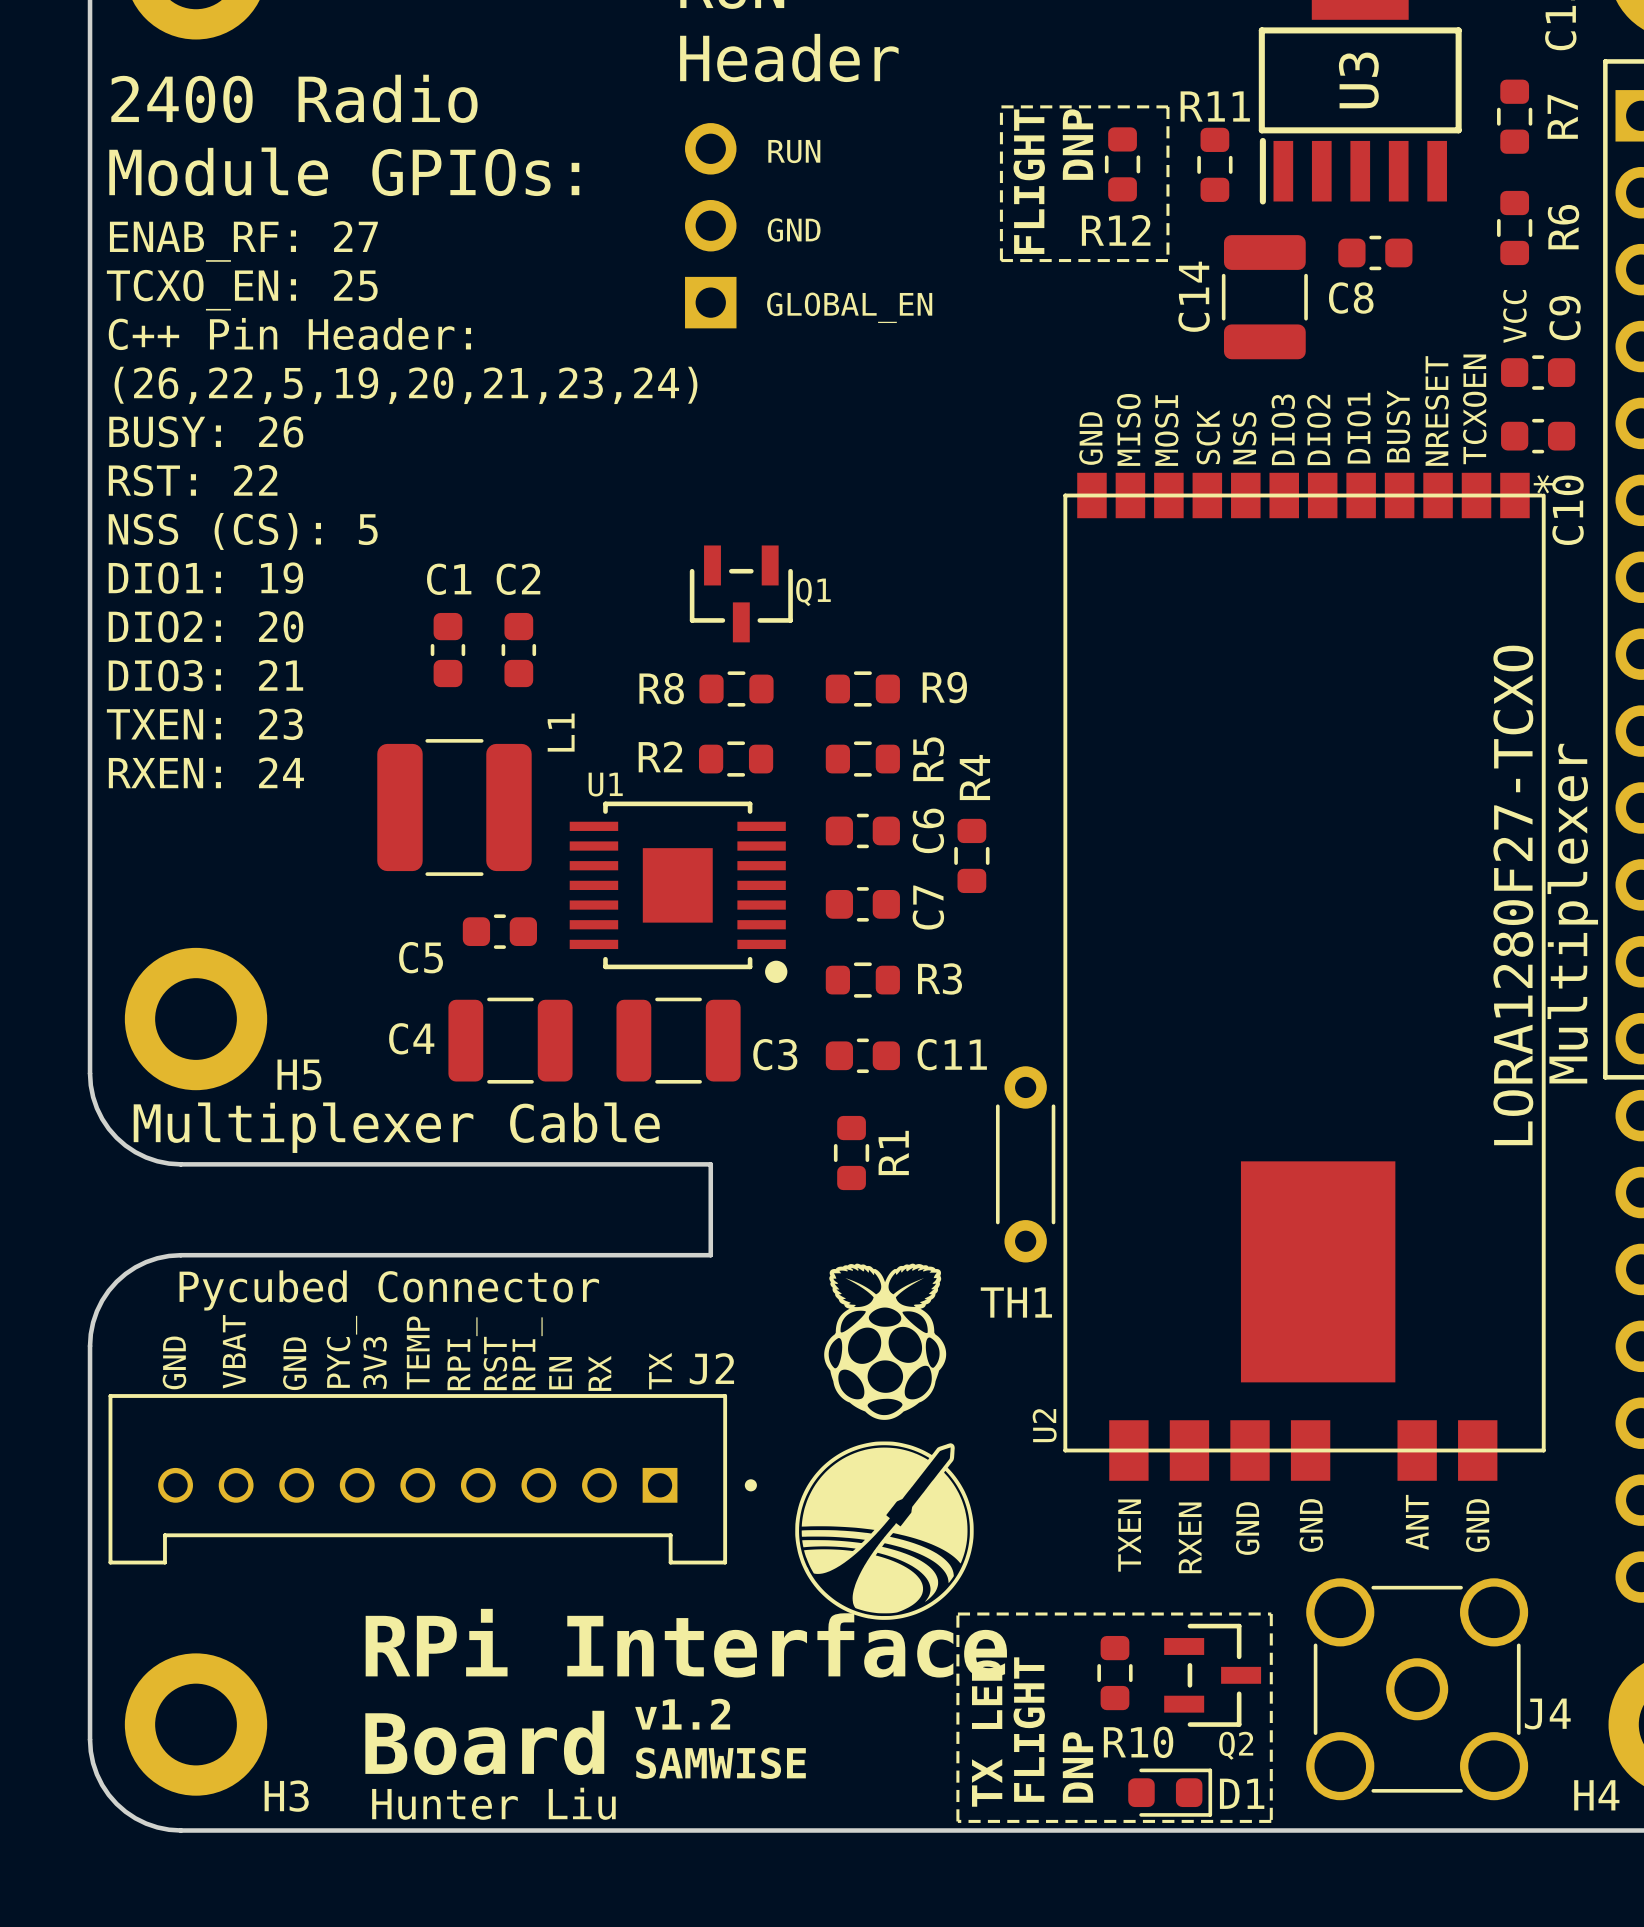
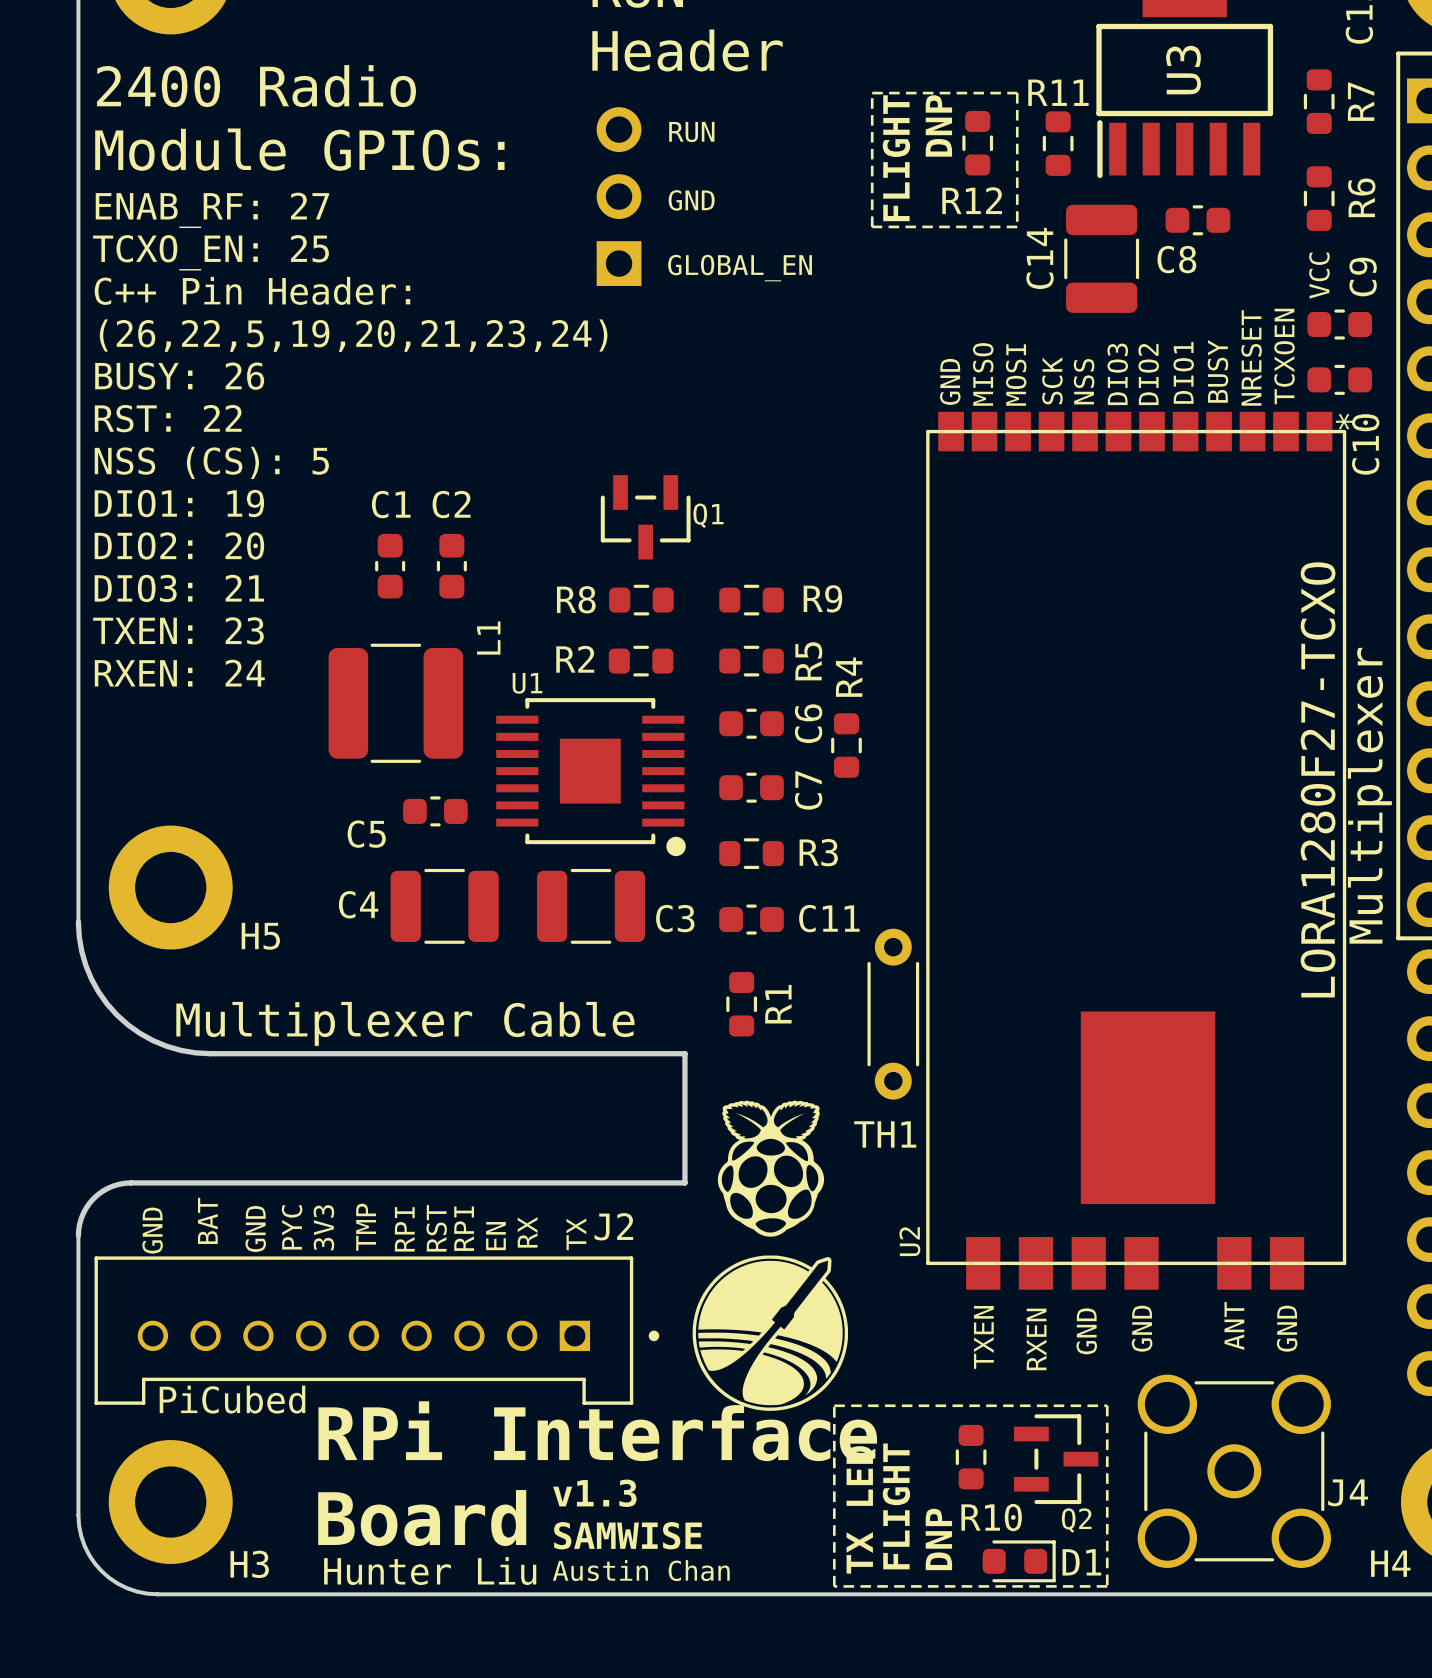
board edge: (90, 1058) (93, 1097) (96, 1108) (108, 1128) (116, 1137) (135, 1152) (146, 1157) (169, 1163) (710, 1164) (710, 1255) (180, 1255) (169, 1255) (146, 1262) (125, 1273) (116, 1281) (108, 1290) (96, 1311) (90, 1334) (90, 1346) (90, 1418) -> (78, 921) (81, 951) (85, 965) (91, 979) (107, 1004) (128, 1024) (140, 1033) (166, 1046) (180, 1050) (210, 1053) (684, 1053) (684, 1182) (125, 1183) (108, 1188) (89, 1202) (81, 1218) (78, 1235)
text position: Multiplexer Cable (396, 1127) -> Multiplexer Cable (405, 1023)
text: Pycubed Connector (389, 1290) -> none
text: VBAT (234, 1351) -> BAT (207, 1220)
text: PYC_ (341, 1351) -> PYC (292, 1227)
text: TEMP (418, 1352) -> TMP (366, 1227)
text: RPI_ (462, 1353) -> RPI (404, 1229)
text: RPI_ (527, 1353) -> RPI (464, 1228)
text position: GND (174, 1362) -> GND (152, 1230)
text position: 3V3 (375, 1362) -> 3V3 (323, 1227)
text position: GND (294, 1363) -> GND (255, 1228)
text position: RST (495, 1363) -> RST (436, 1228)
J2 name position: J2 (711, 1368) -> J2 (613, 1226)
text position: TX (660, 1371) -> TX (576, 1234)
text position: EN (560, 1373) -> EN (495, 1236)
text position: RX (599, 1373) -> RX (527, 1232)
J2 position: (432, 1479) -> (376, 1330)
text: none -> PiCubed (232, 1399)
text: v1.2 (682, 1714) -> v1.3 (594, 1493)
text: none -> Austin Chan (641, 1570)

